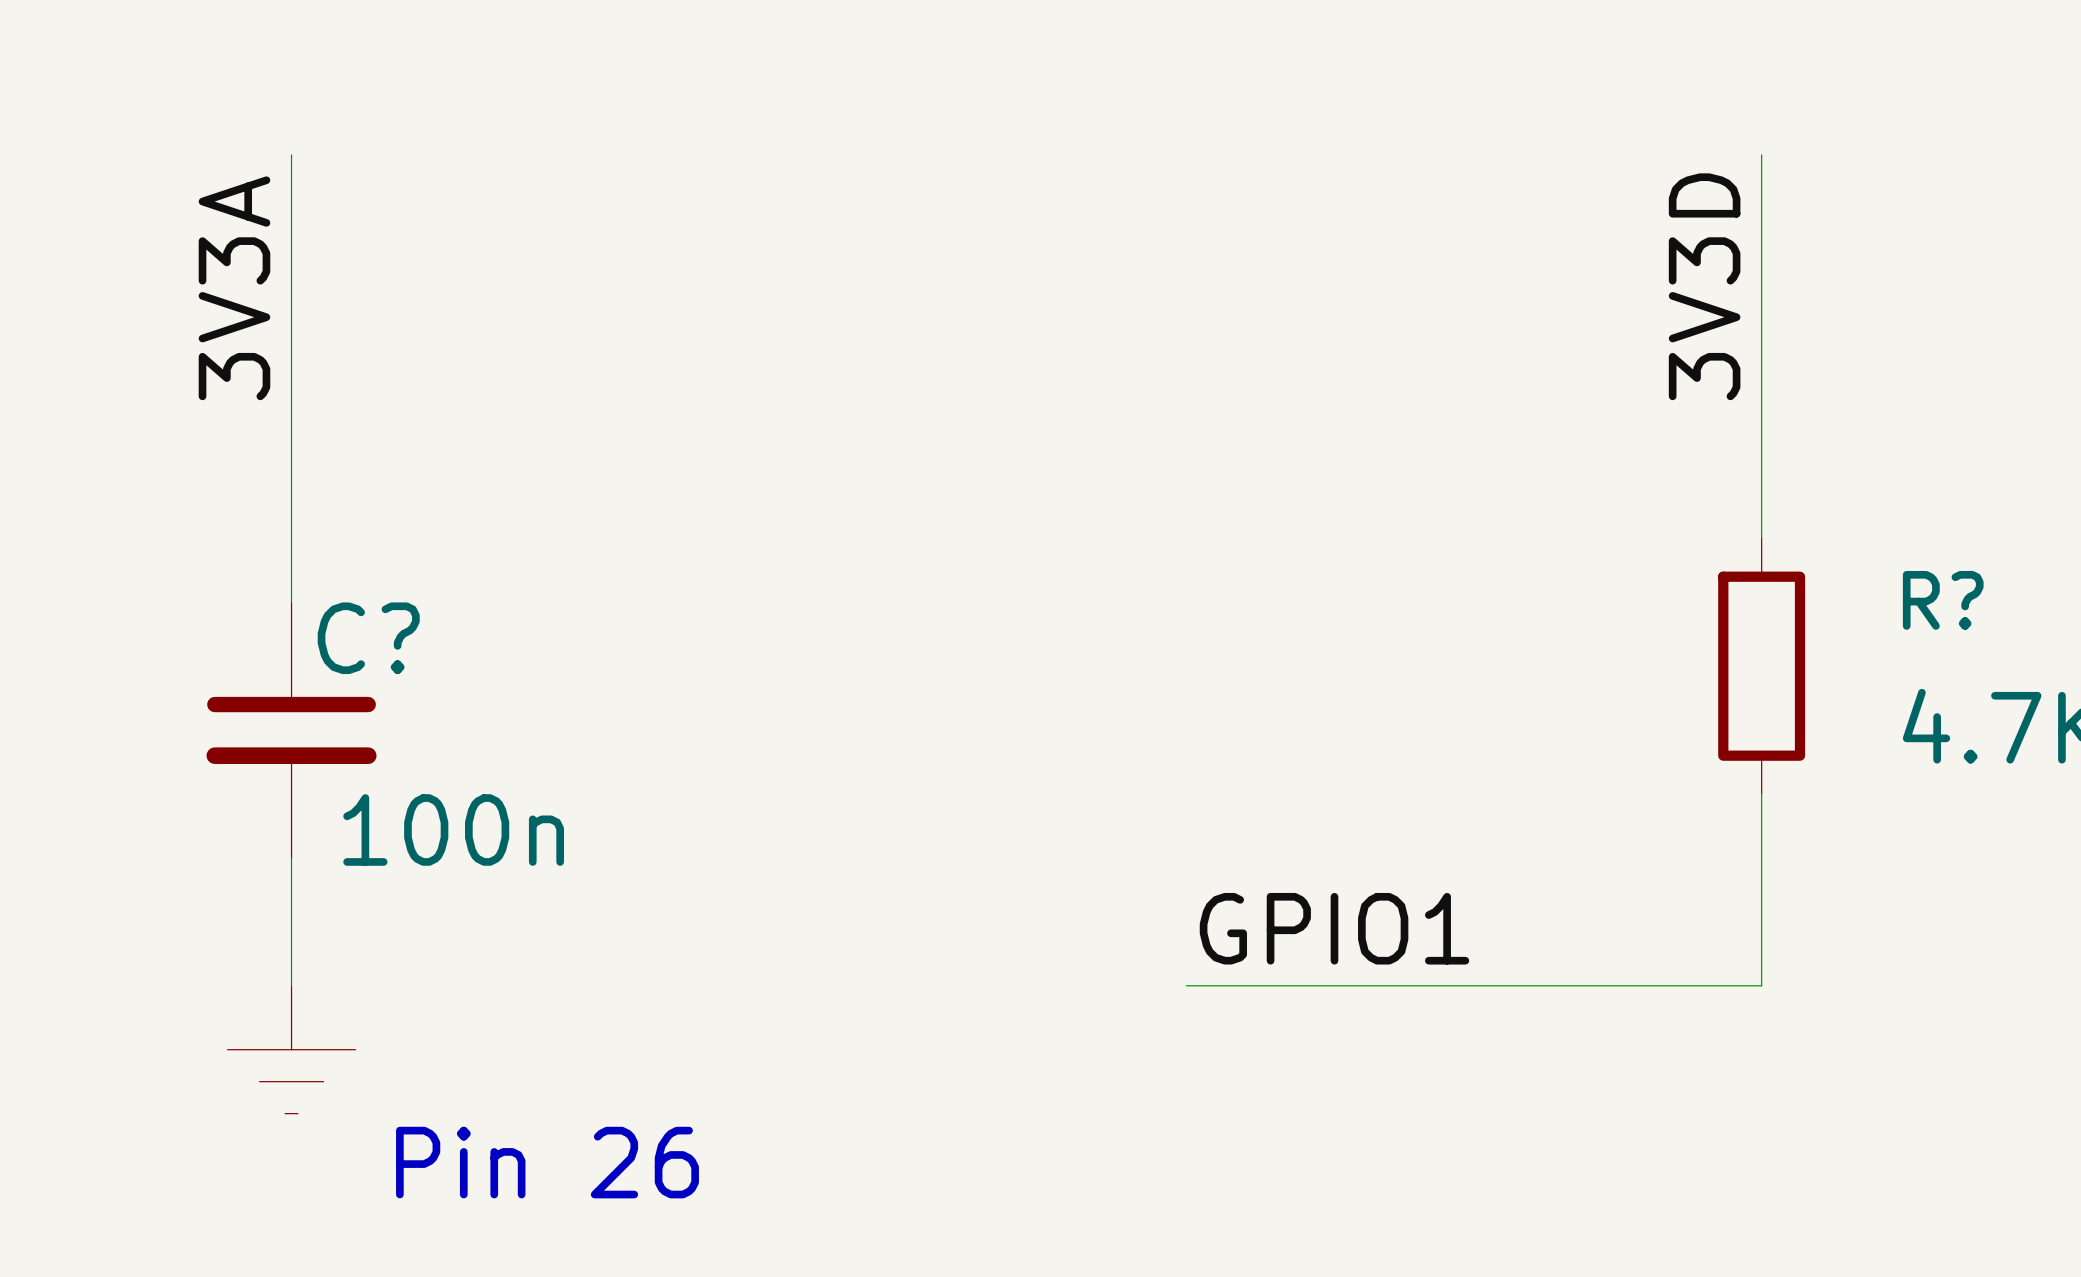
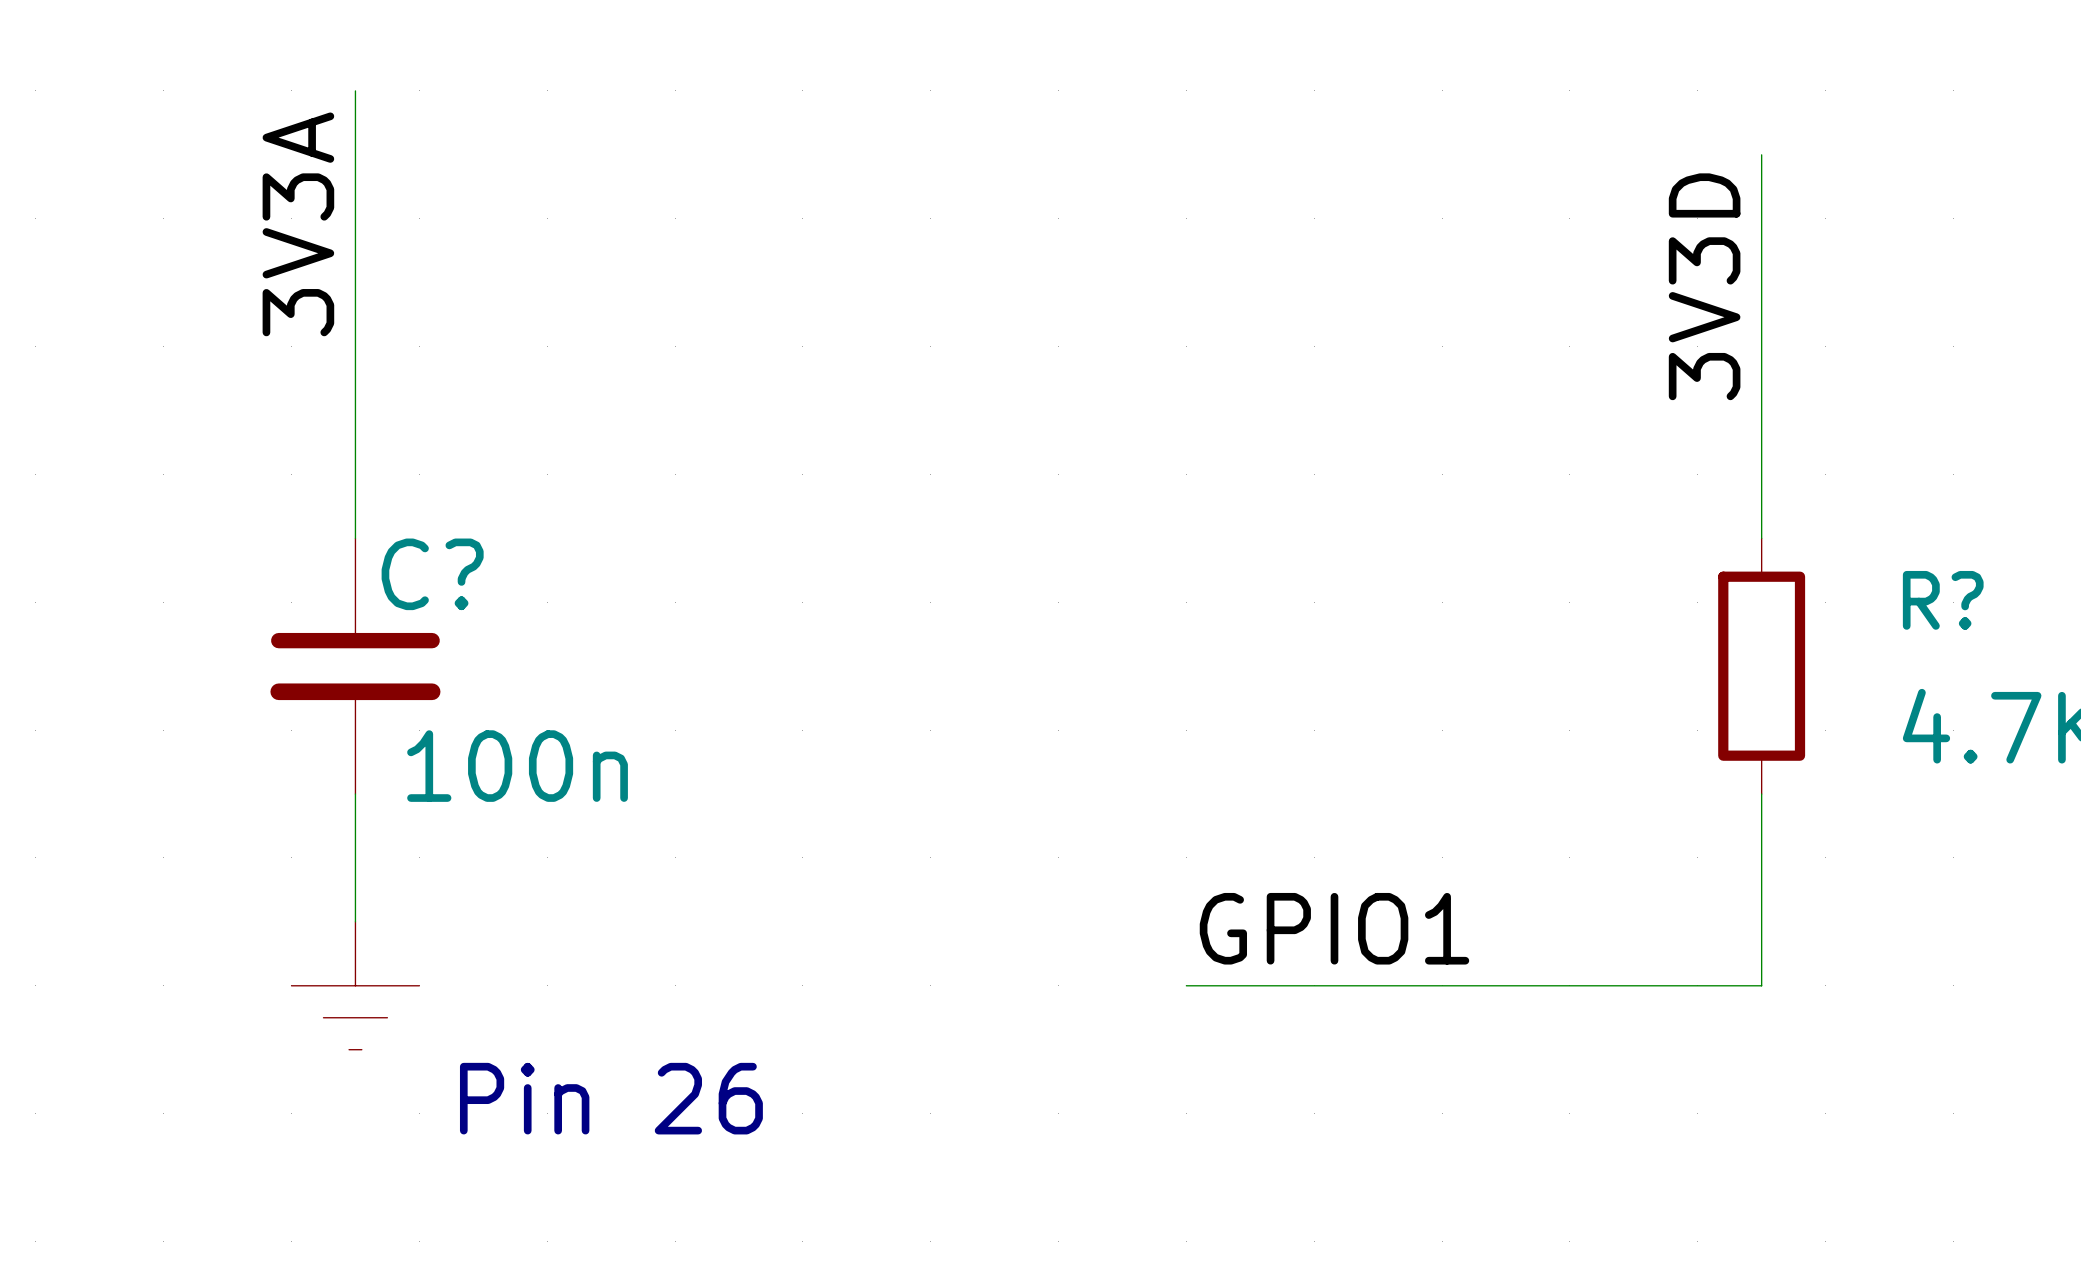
wire: (291, 154) (291, 602) -> (355, 90) (355, 538)
label position: 3V3A (234, 288) -> 3V3A (298, 224)
C? position: (291, 730) -> (355, 666)
wire: (291, 857) (291, 985) -> (355, 794) (355, 921)
power symbol position: (291, 1049) -> (355, 985)
text position: Pin 26 (547, 1162) -> Pin 26 (611, 1098)

